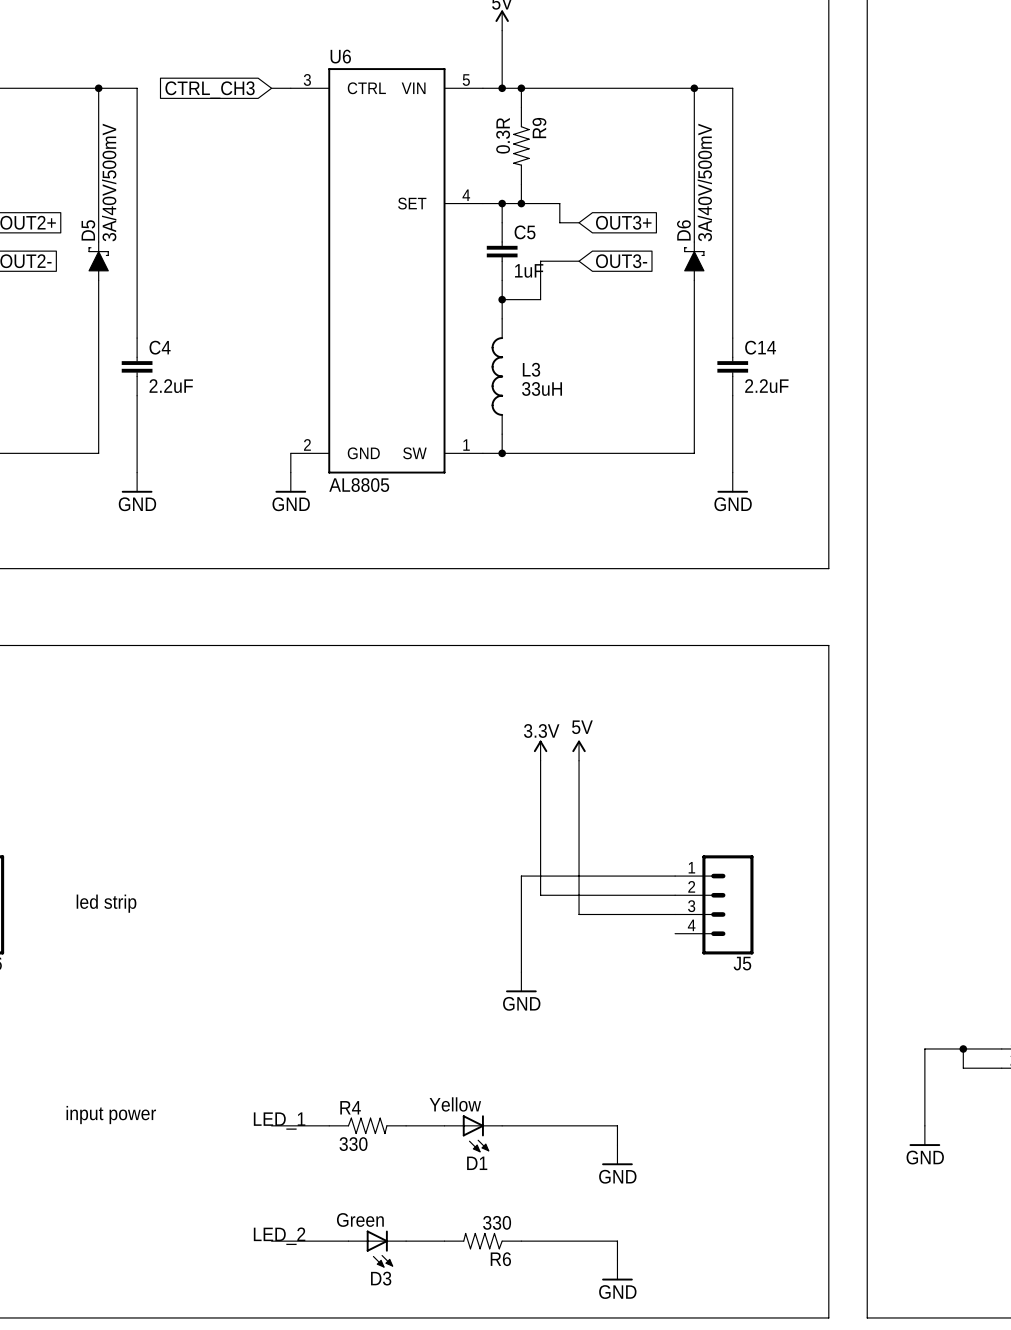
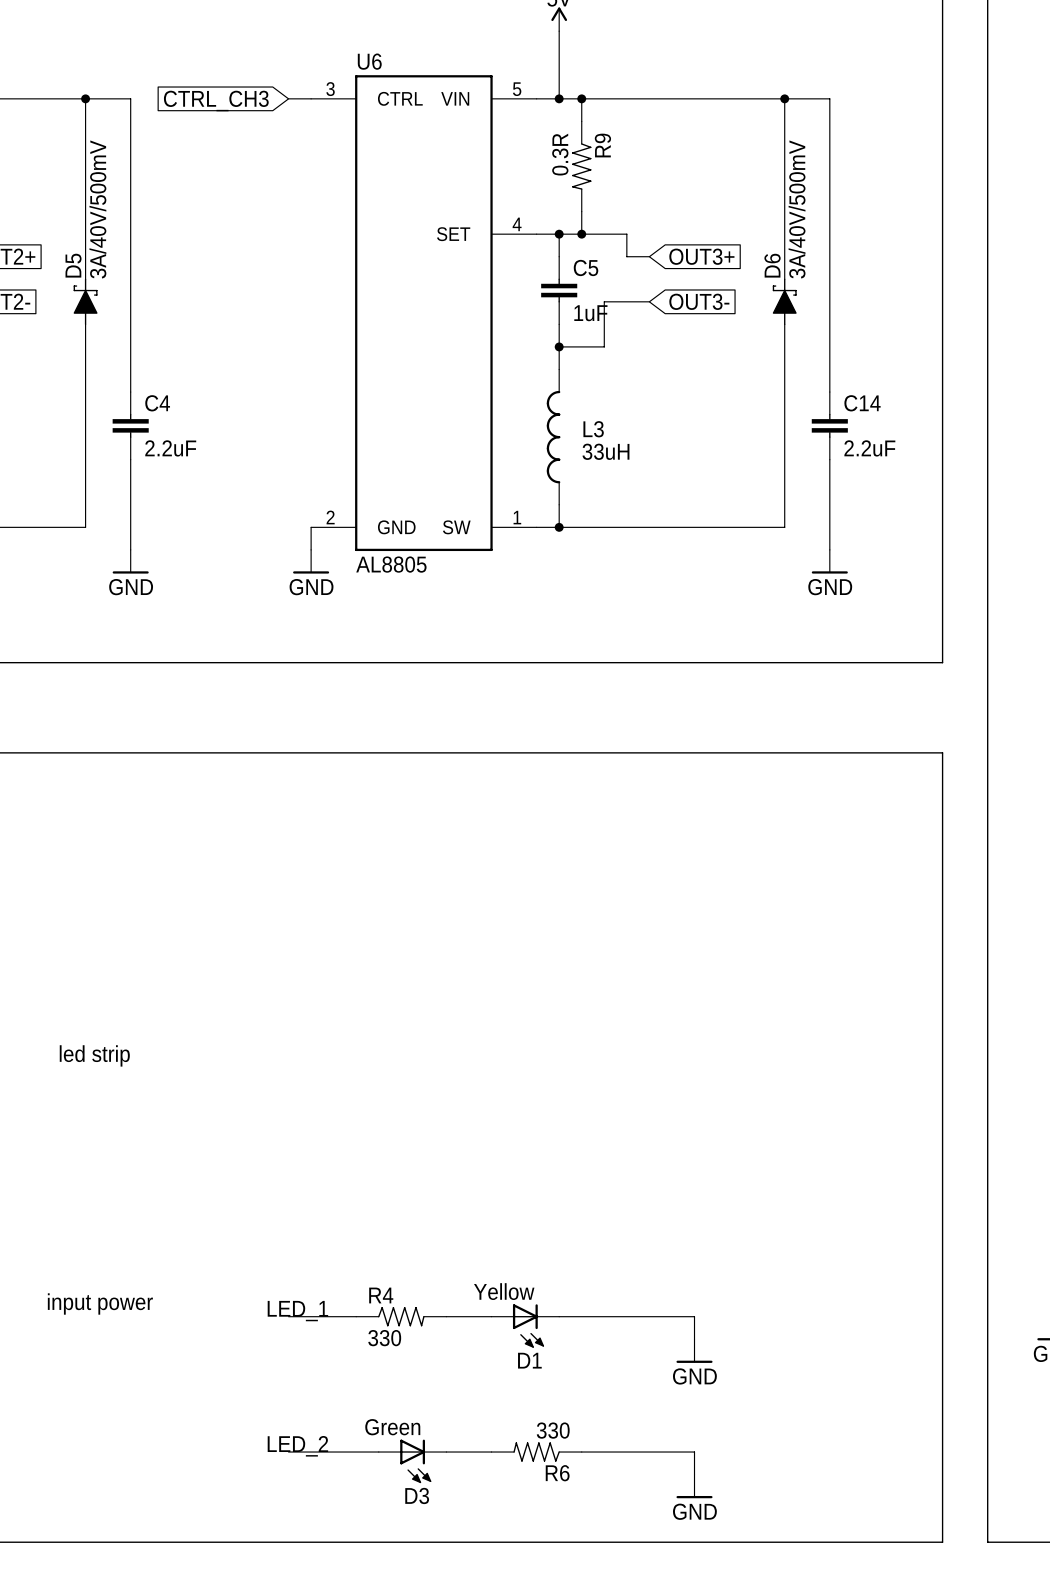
power symbol: 3.3V (540, 750) -> none
power symbol: 5V (579, 750) -> none
wire: (540, 760) (540, 895) (675, 895) -> none
wire: (579, 760) (579, 914) (675, 914) -> none
wire: (675, 876) (521, 876) (521, 972) -> none
J5: (714, 904) -> none
power symbol: GND (521, 982) -> none

